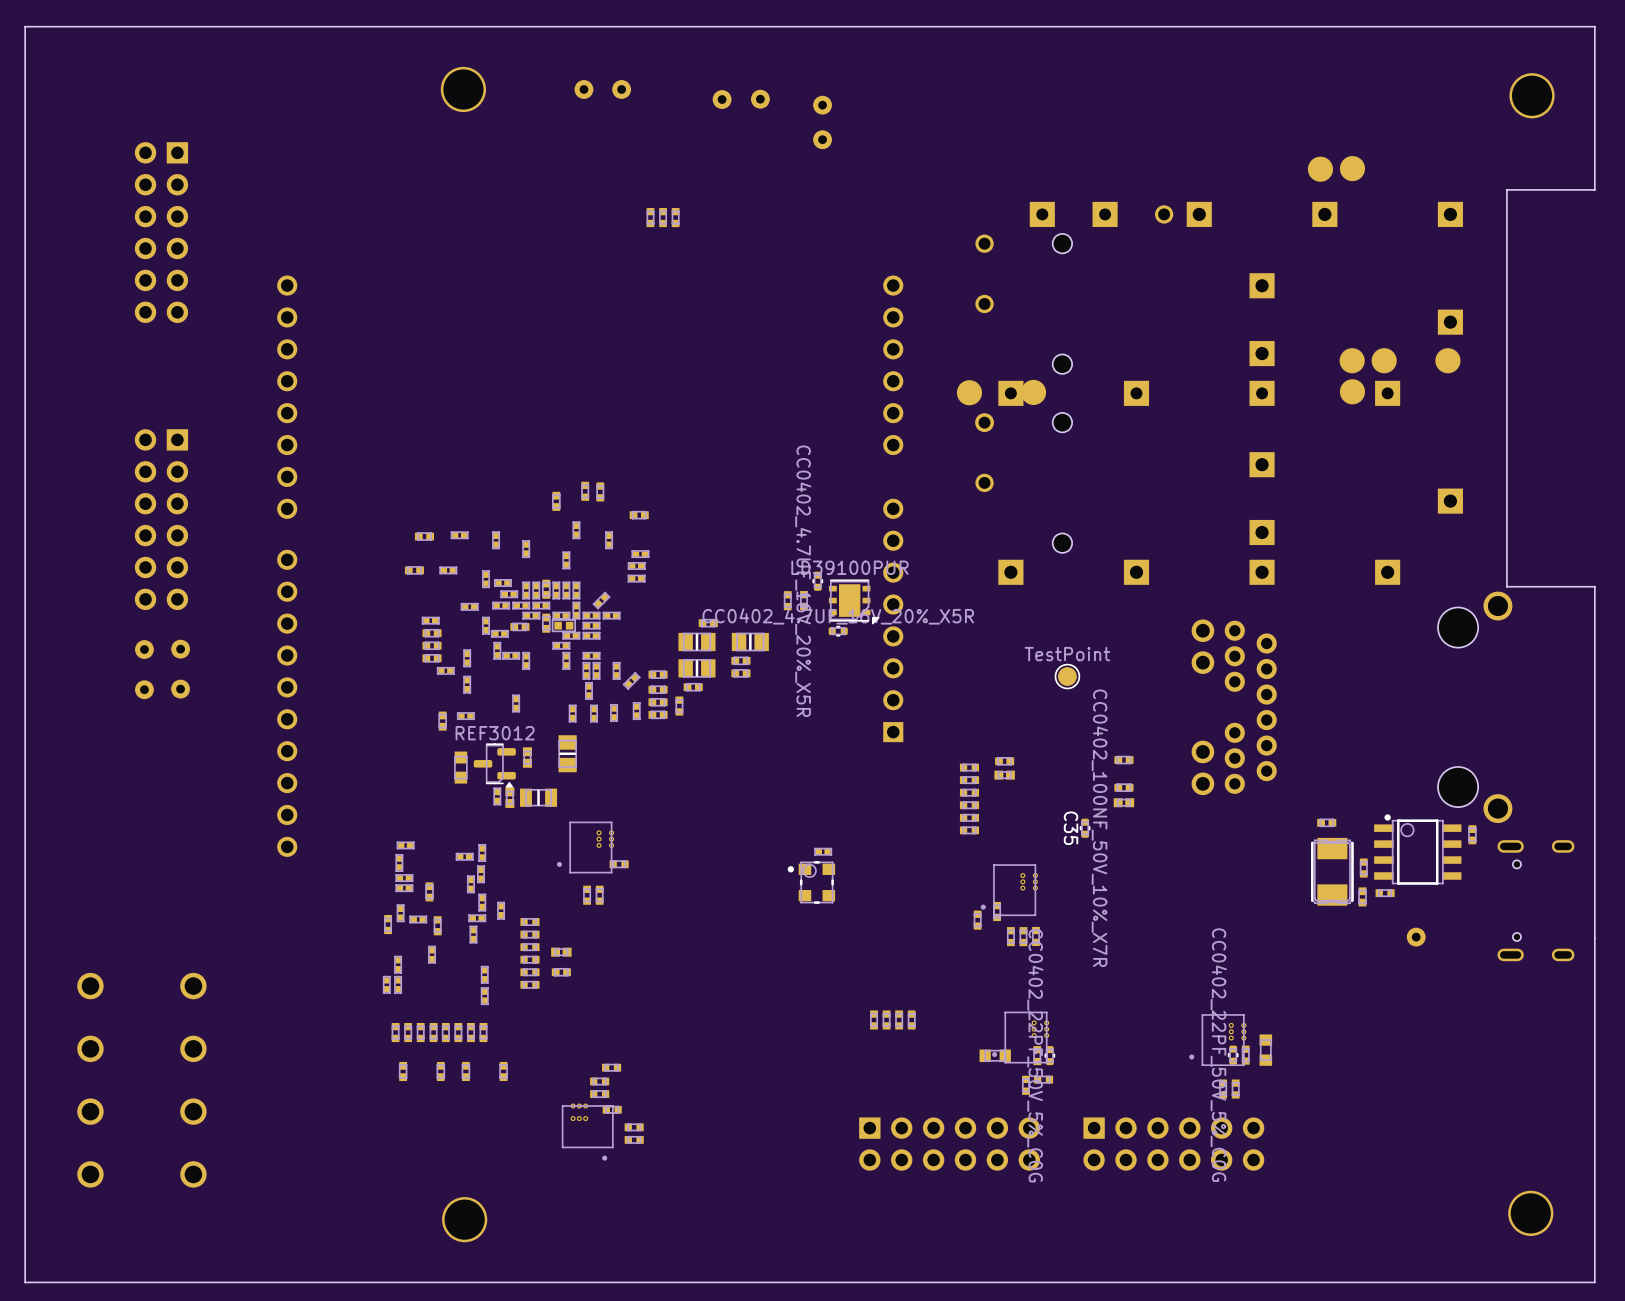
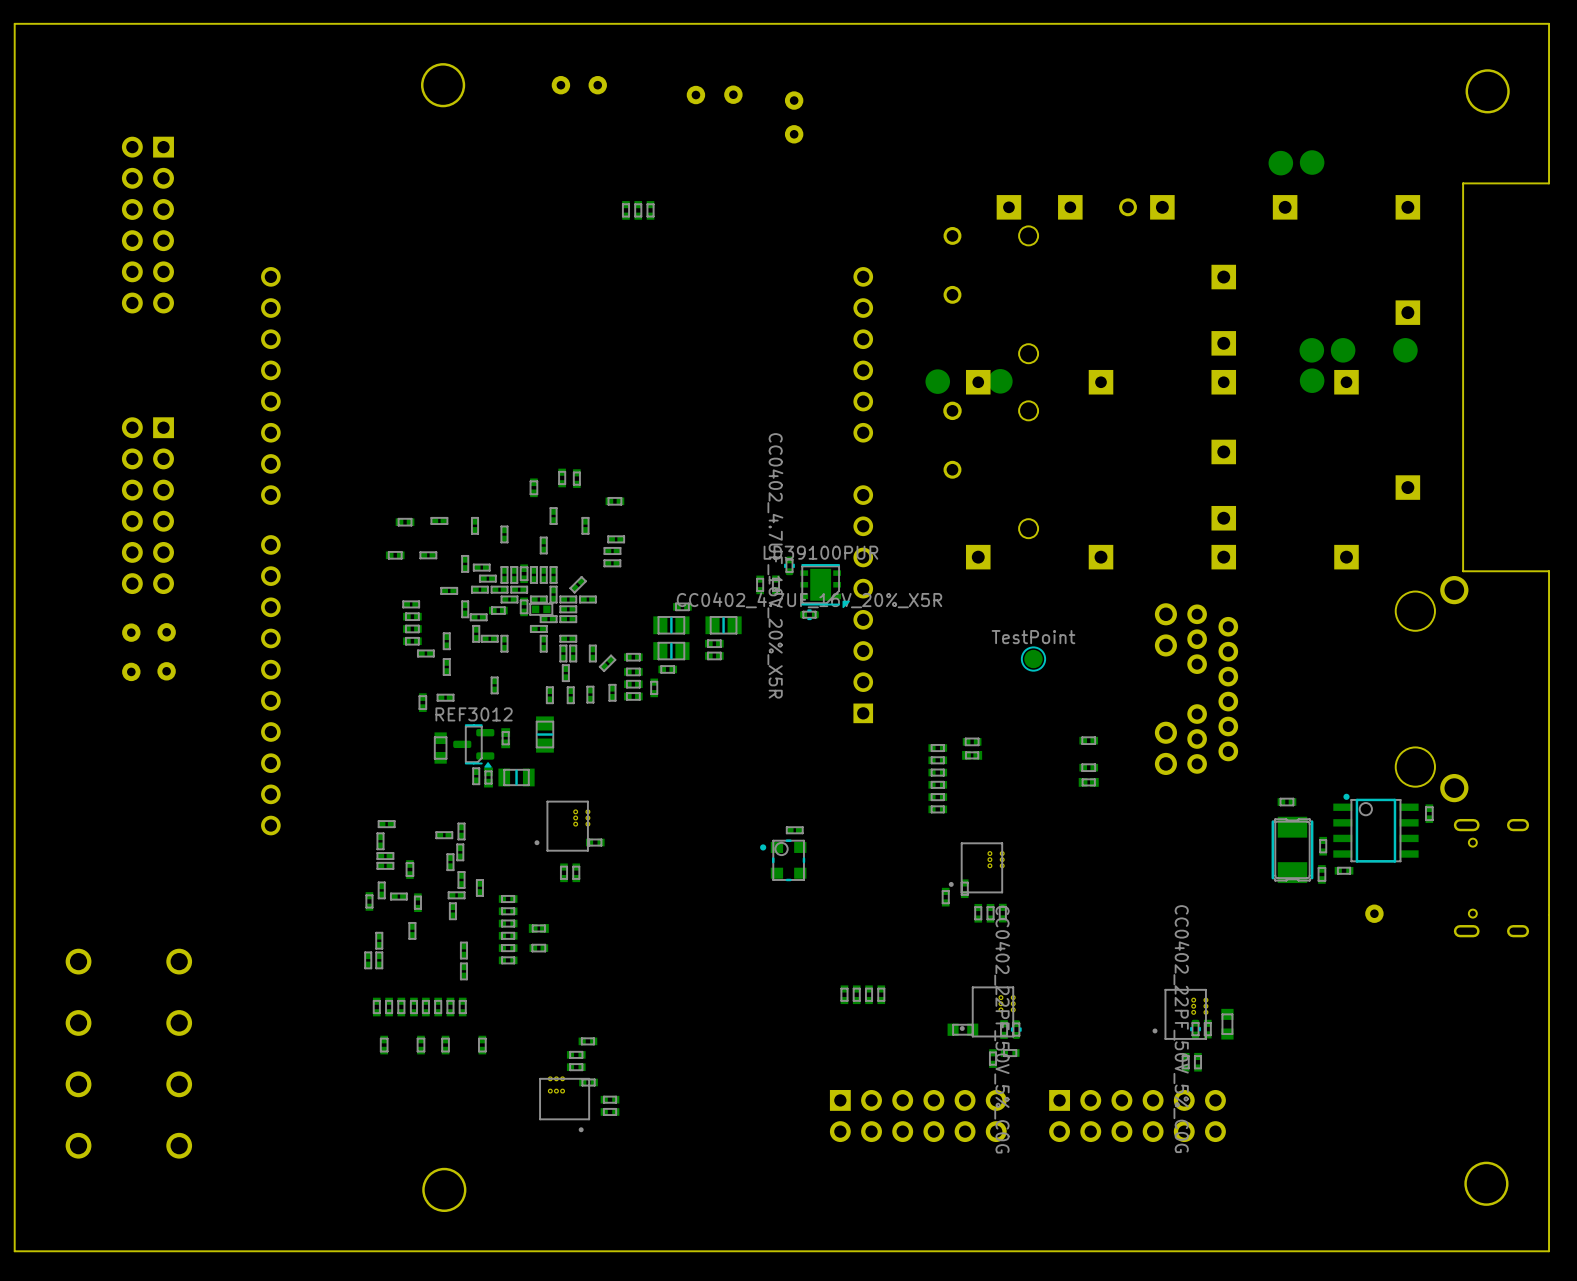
C35: CC0402_100NF_50V_10%_X7R (1085, 828) -> none

